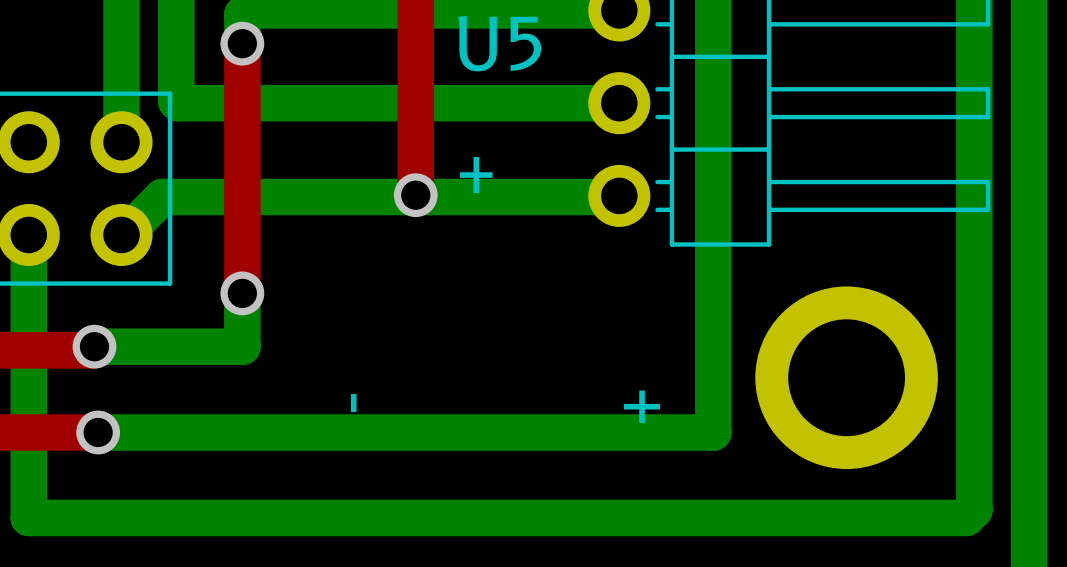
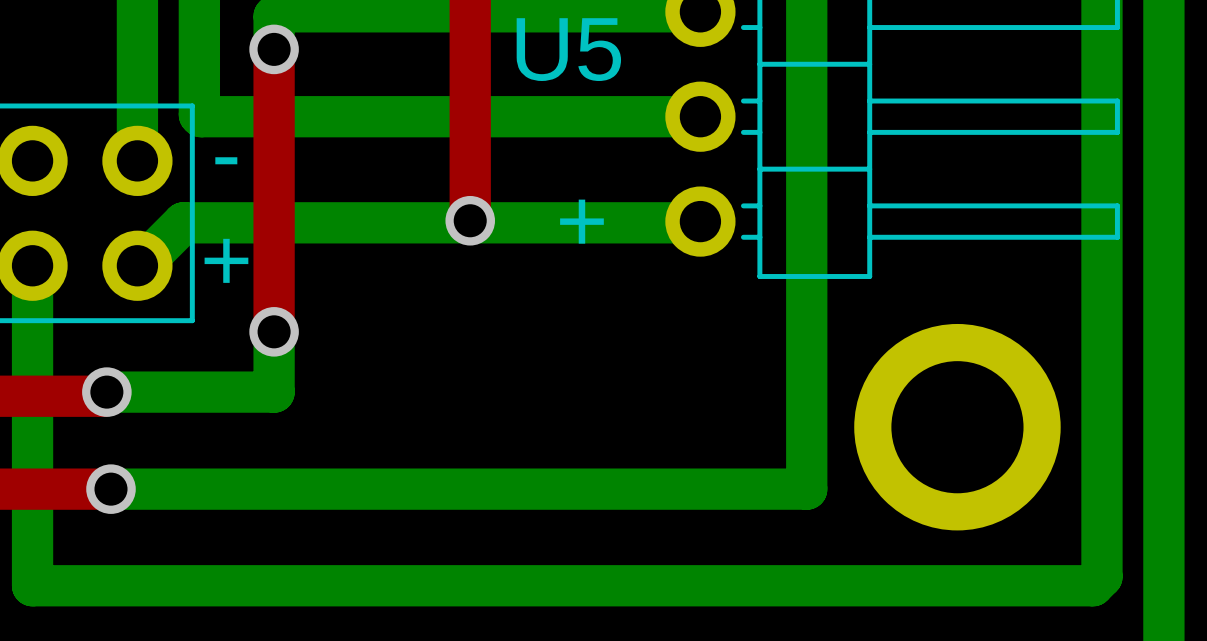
text rotation: 0° (476, 174) -> 180° (581, 221)
text: none -> + (226, 260)
text rotation: 0° (353, 403) -> 90° counterclockwise (226, 160)
text position: - (353, 403) -> - (226, 160)
text: + (642, 406) -> none

